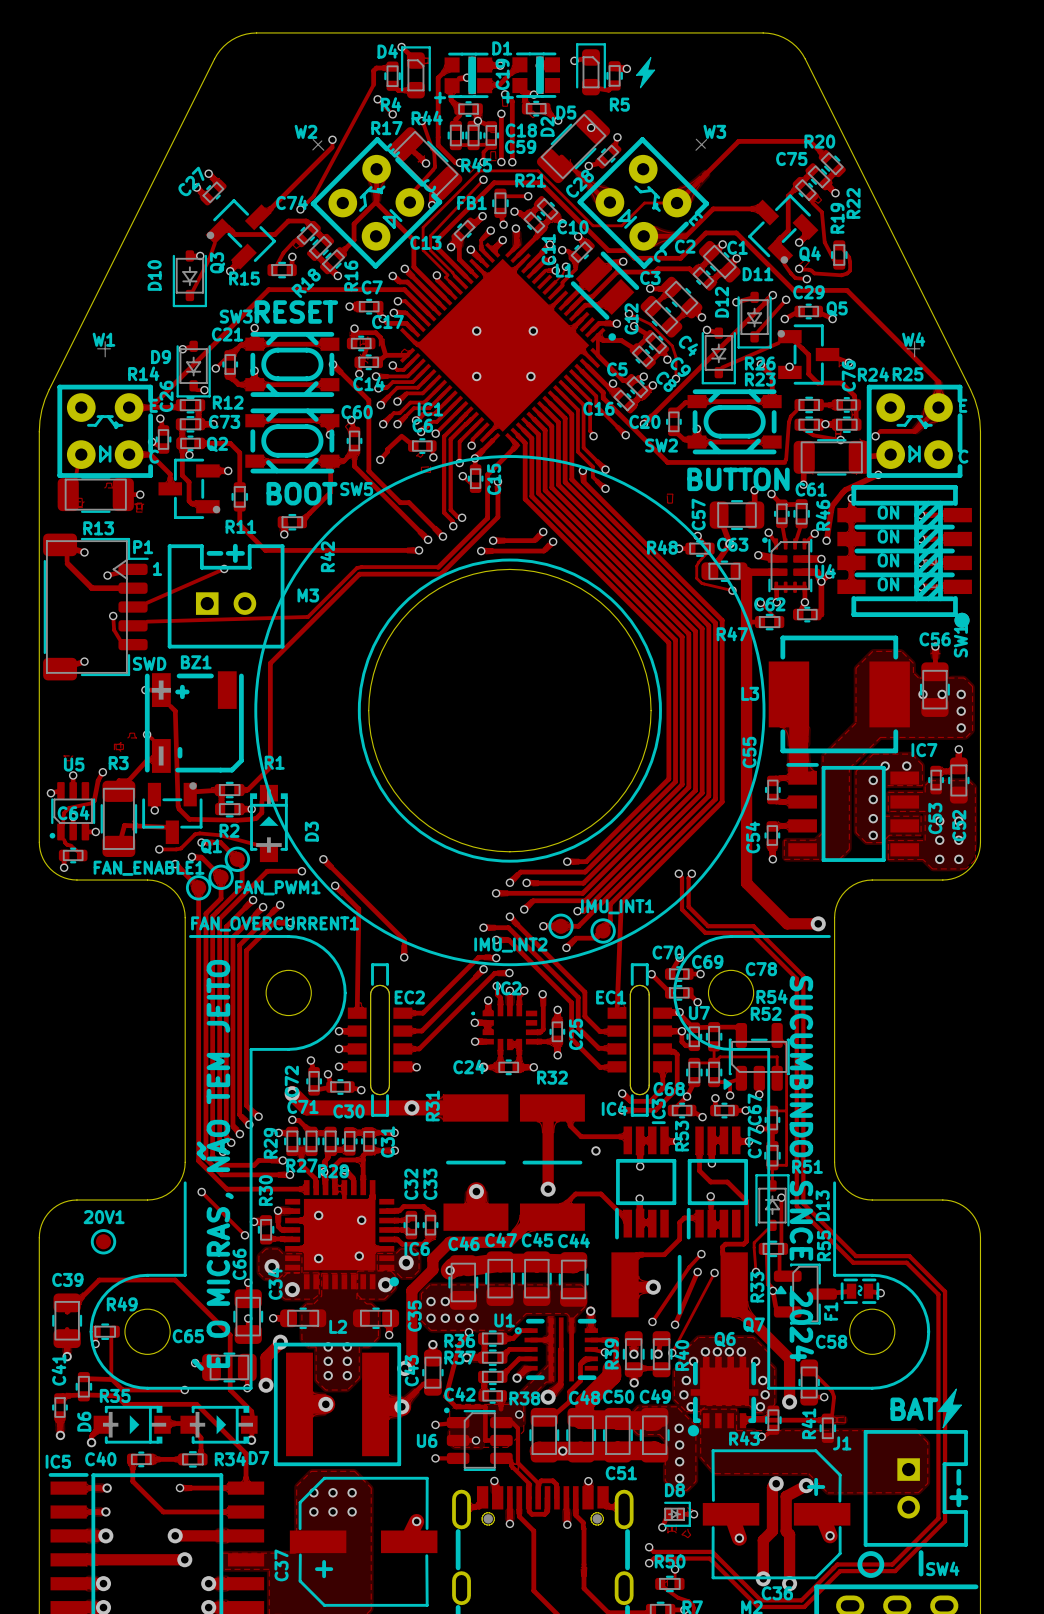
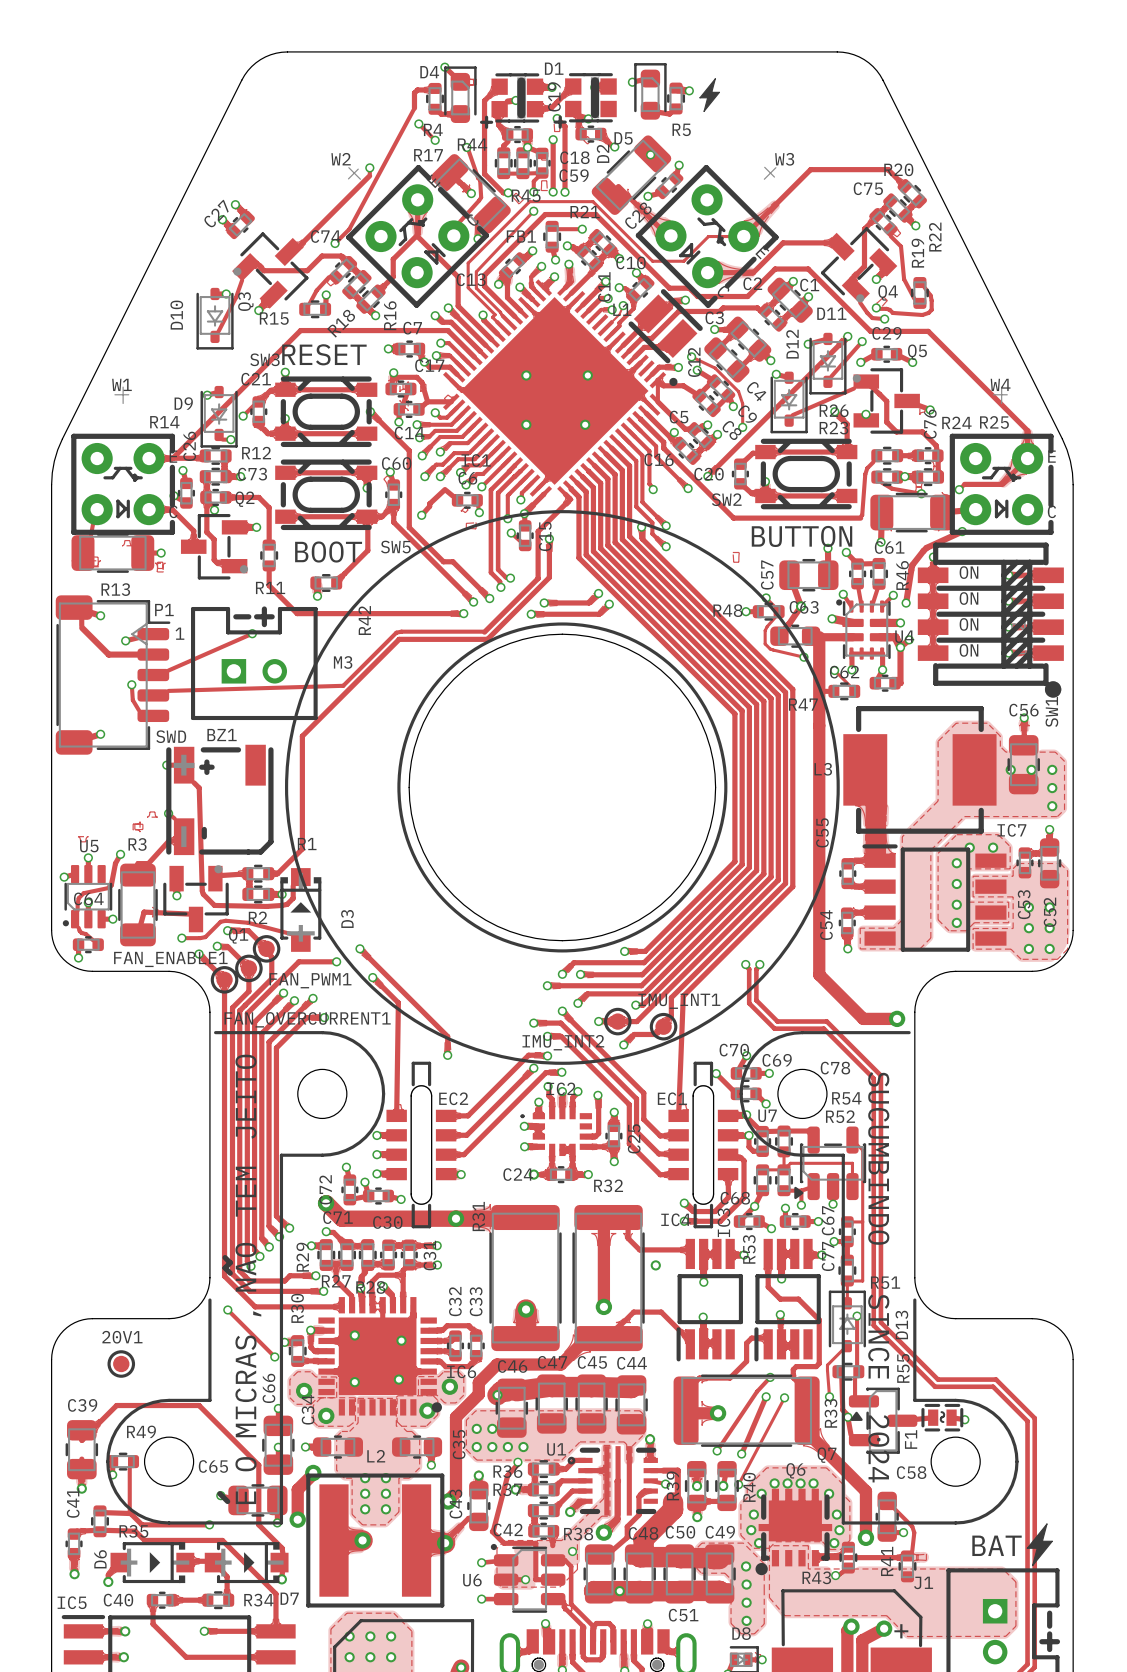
R31 footprint: [443, 1094, 509, 1231] -> [489, 1204, 562, 1352]
R32 footprint: [519, 1094, 585, 1231] -> [572, 1204, 645, 1352]
R33 footprint: [611, 1252, 748, 1318] -> [673, 1374, 820, 1447]

